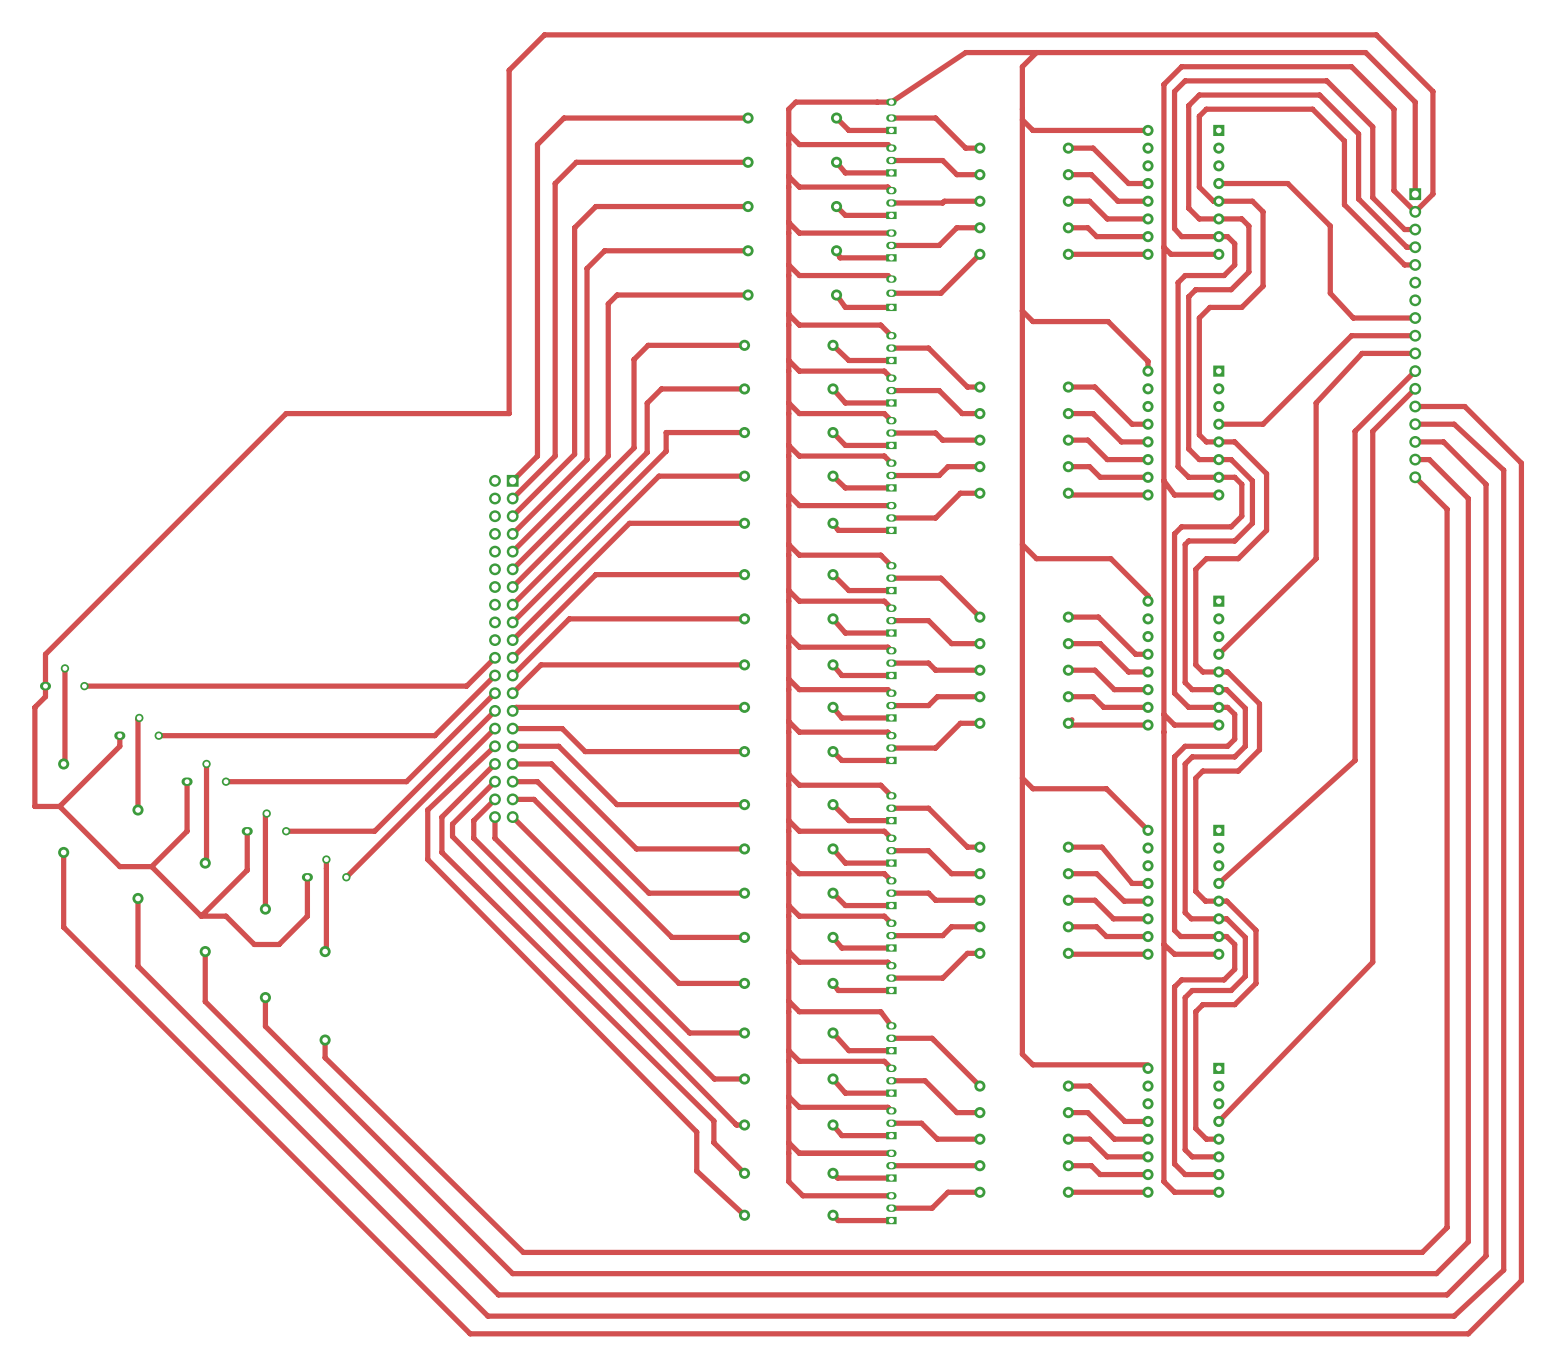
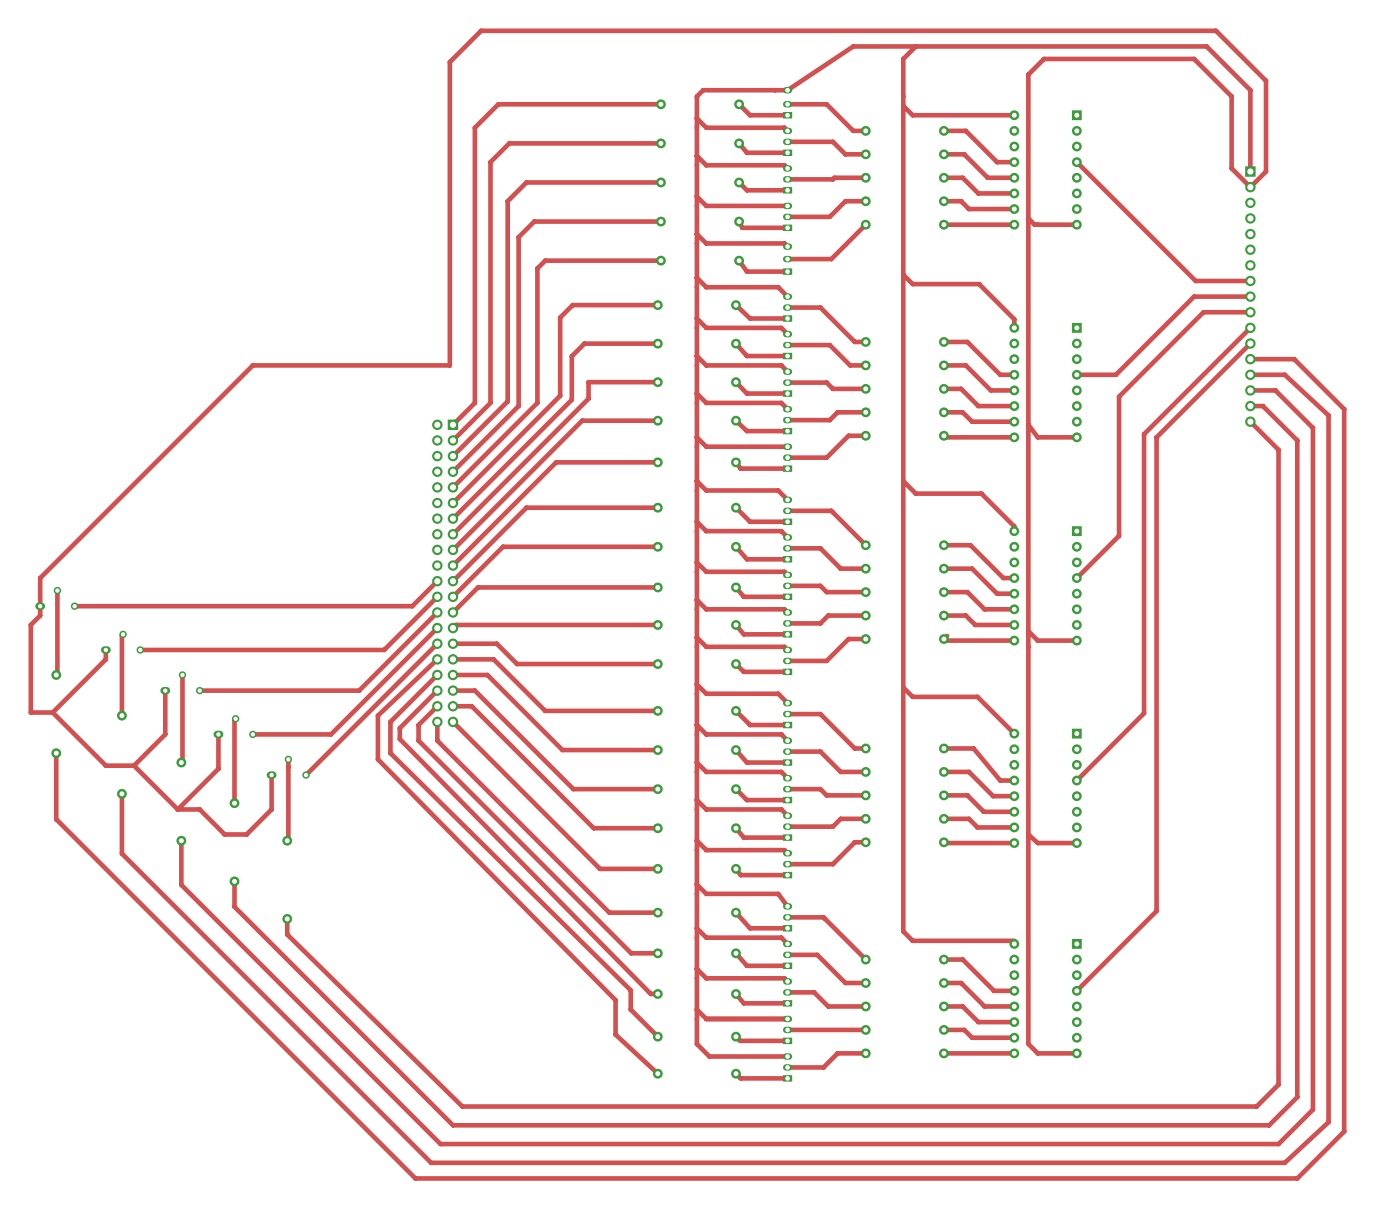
top track: (1218, 183) (1287, 183) (1330, 226) (1330, 293) (1353, 318) -> (1076, 162) (1195, 280)
top track: (1415, 229) (1404, 229) (1372, 197) (1372, 126) (1326, 80) (1185, 80) (1174, 91) (1174, 228) (1181, 236) (1227, 236) (1234, 243) (1234, 264) (1224, 275) (1185, 275) (1178, 282) (1178, 466) (1188, 477) (1234, 477) (1241, 484) (1241, 516) (1231, 526) (1181, 526) (1174, 533) (1174, 693) (1188, 707) (1227, 707) (1234, 714) (1234, 739) (1227, 746) (1185, 746) (1174, 756) (1174, 930) (1180, 936) (1226, 936) (1234, 944) (1234, 969) (1224, 979) (1181, 979) (1174, 986) (1174, 1163) (1185, 1174) (1218, 1174) -> none
top track: (1415, 247) (1406, 247) (1358, 198) (1358, 133) (1319, 95) (1199, 95) (1188, 105) (1188, 208) (1199, 218) (1241, 218) (1248, 226) (1248, 272) (1231, 289) (1195, 289) (1188, 296) (1188, 448) (1199, 459) (1231, 459) (1252, 480) (1252, 523) (1234, 541) (1188, 541) (1185, 544) (1185, 682) (1192, 689) (1226, 689) (1245, 708) (1245, 746) (1234, 756) (1192, 756) (1185, 763) (1185, 912) (1191, 918) (1226, 918) (1245, 937) (1245, 976) (1231, 990) (1192, 990) (1185, 997) (1185, 1149) (1192, 1156) (1218, 1156) -> none
top track: (1415, 264) (1404, 264) (1344, 204) (1344, 141) (1312, 109) (1206, 109) (1199, 116) (1199, 187) (1213, 201) (1252, 201) (1263, 211) (1263, 286) (1241, 307) (1209, 307) (1199, 318) (1199, 434) (1206, 441) (1234, 441) (1266, 473) -> (1203, 312) (1119, 396) (1119, 418)
top track: (1362, 353) (1316, 402) (1316, 558) (1218, 654) -> (1119, 468) (1119, 535) (1076, 578)
top track: (1355, 431) (1355, 760) (1218, 883) -> (1197, 381) (1144, 434) (1144, 713) (1076, 780)
top track: (1372, 431) (1372, 962) (1218, 1121) -> (1212, 381) (1156, 437) (1156, 911) (1076, 990)
top track: (1266, 530) (1238, 558) (1206, 558) (1195, 569) (1195, 664) (1202, 671) (1227, 671) (1259, 703) (1259, 749) (1238, 771) (1202, 771) (1195, 778) (1195, 891) (1205, 901) (1226, 901) (1255, 930) (1255, 983) (1234, 1004) (1202, 1004) (1195, 1011) (1195, 1128) (1206, 1139) (1218, 1139) -> none

